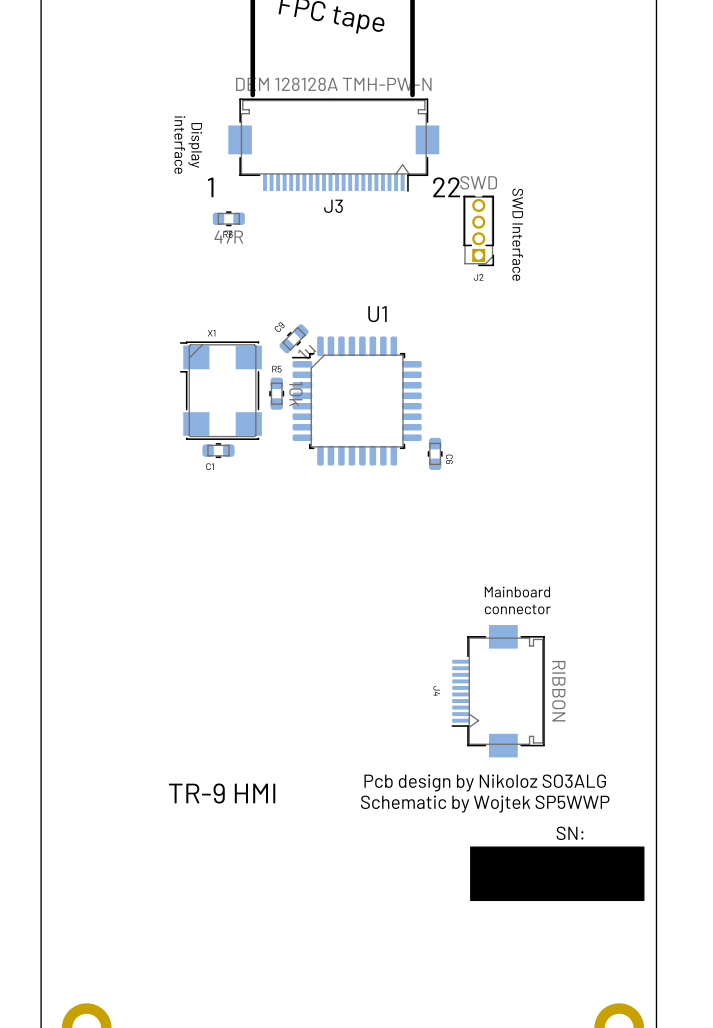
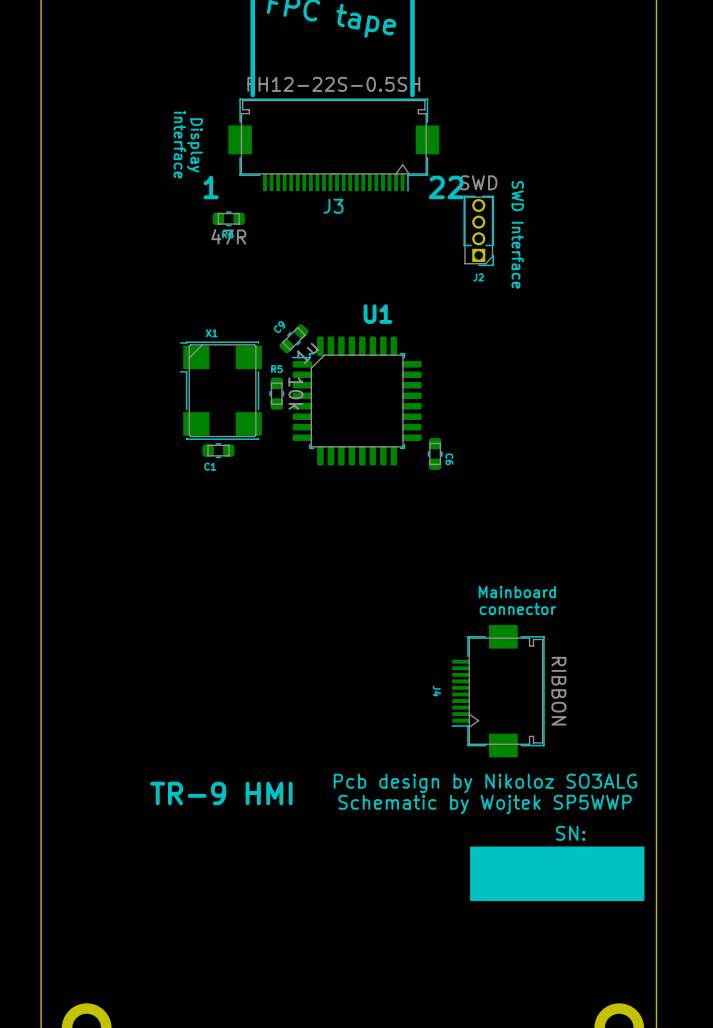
J3 value: DEM 128128A TMH-PW-N (333, 84) -> FH12-22S-0.5SH (333, 84)

